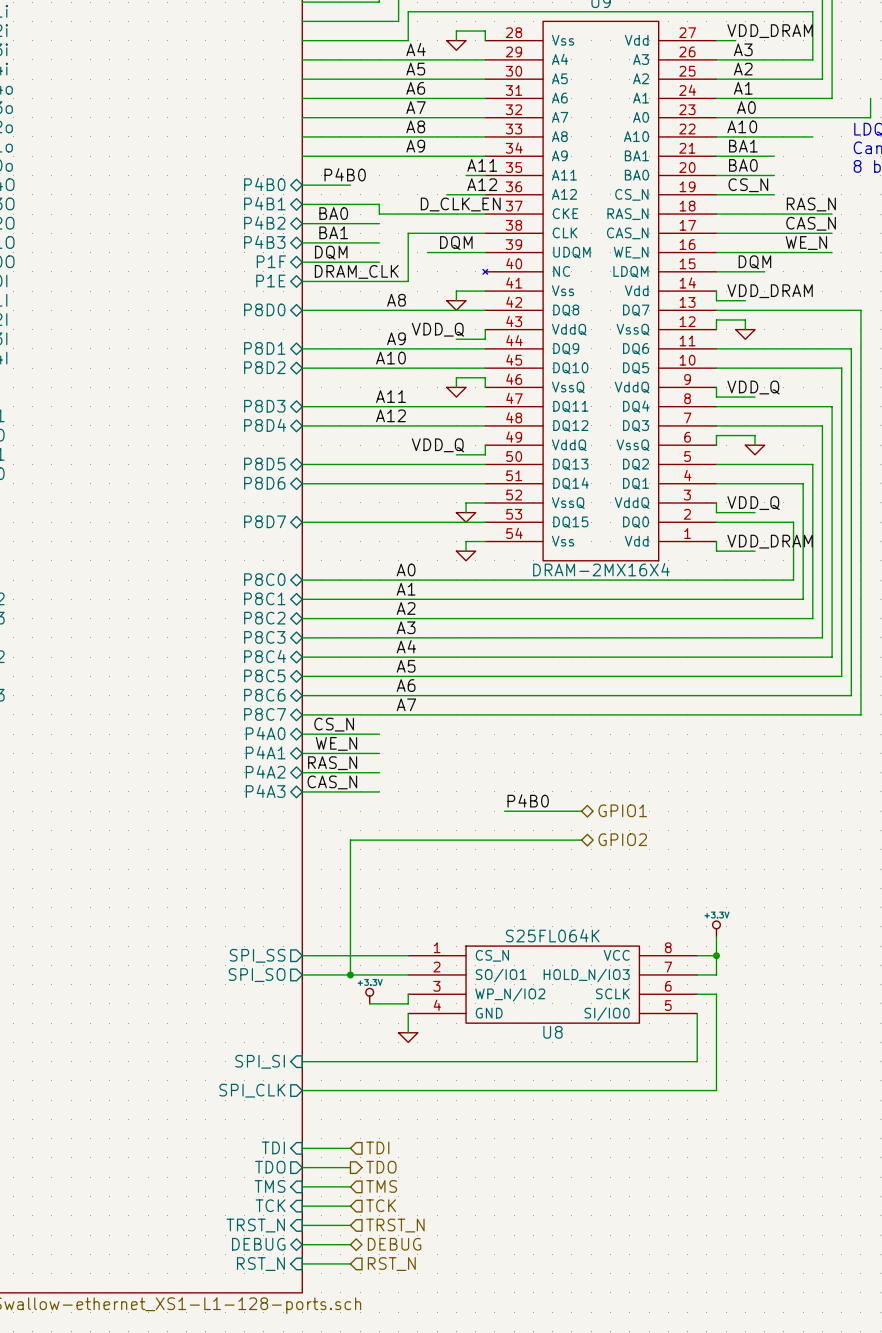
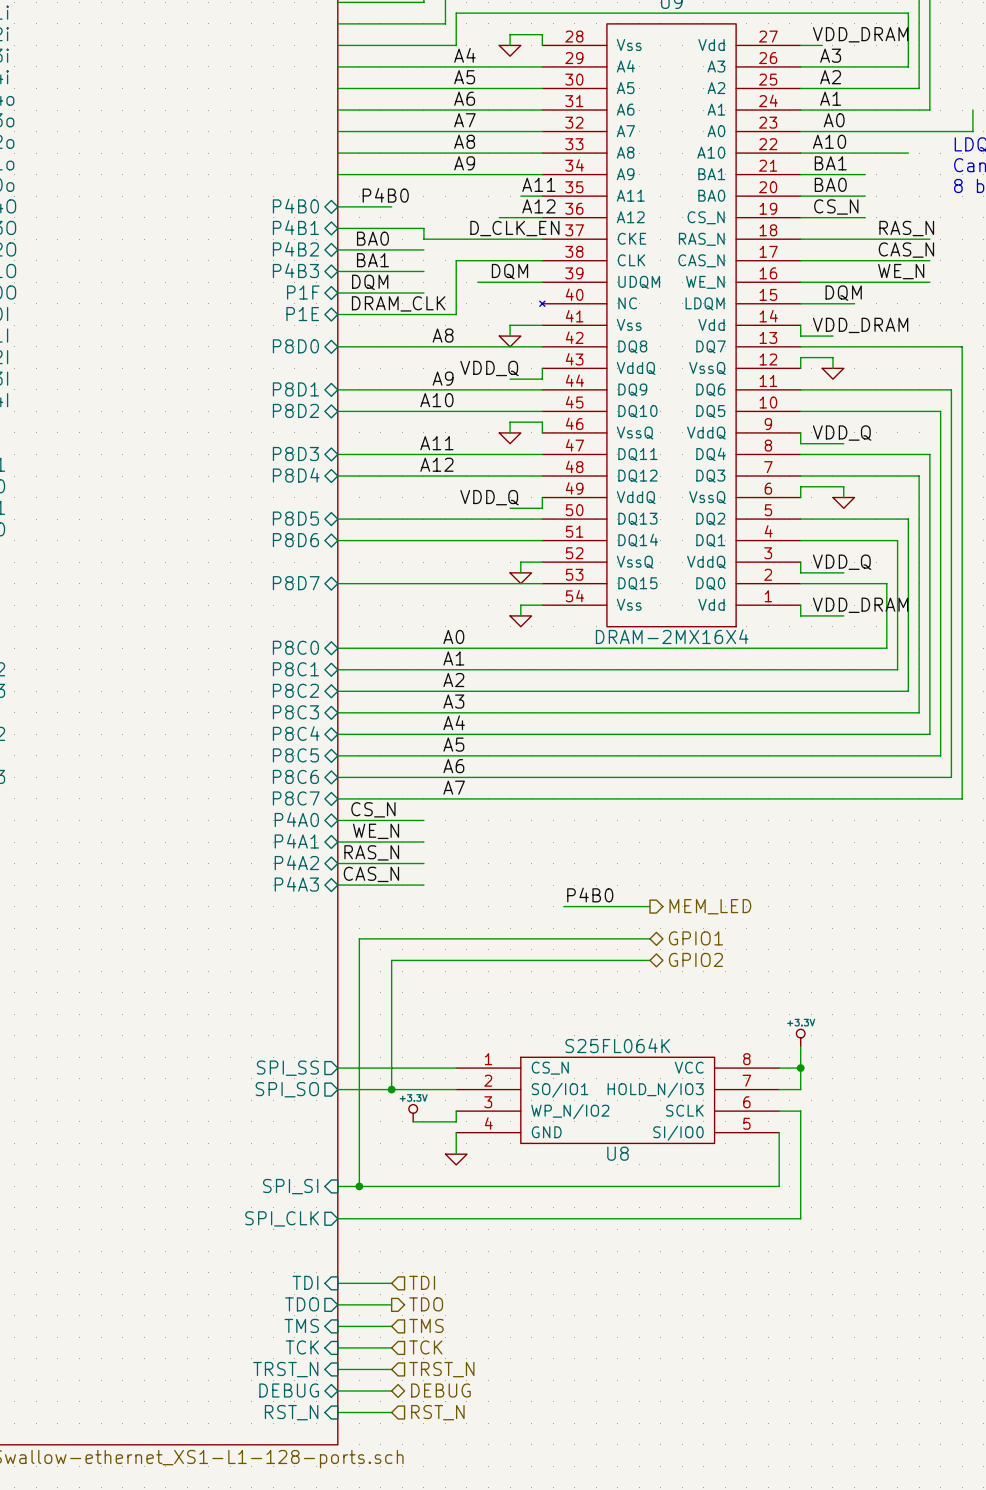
hierarchical label shape: bidirectional (622, 810) -> output (710, 906)
hierarchical label: GPIO1 (622, 810) -> MEM_LED (710, 906)
hierarchical label: GPIO2 (622, 839) -> GPIO1 (695, 938)
wire: (350, 840) (350, 859) -> (391, 938) (359, 938) (359, 1186)
hierarchical label: none -> GPIO2 (695, 959)
wire: none -> (391, 960) (649, 960)
junction: none -> (359, 1186)

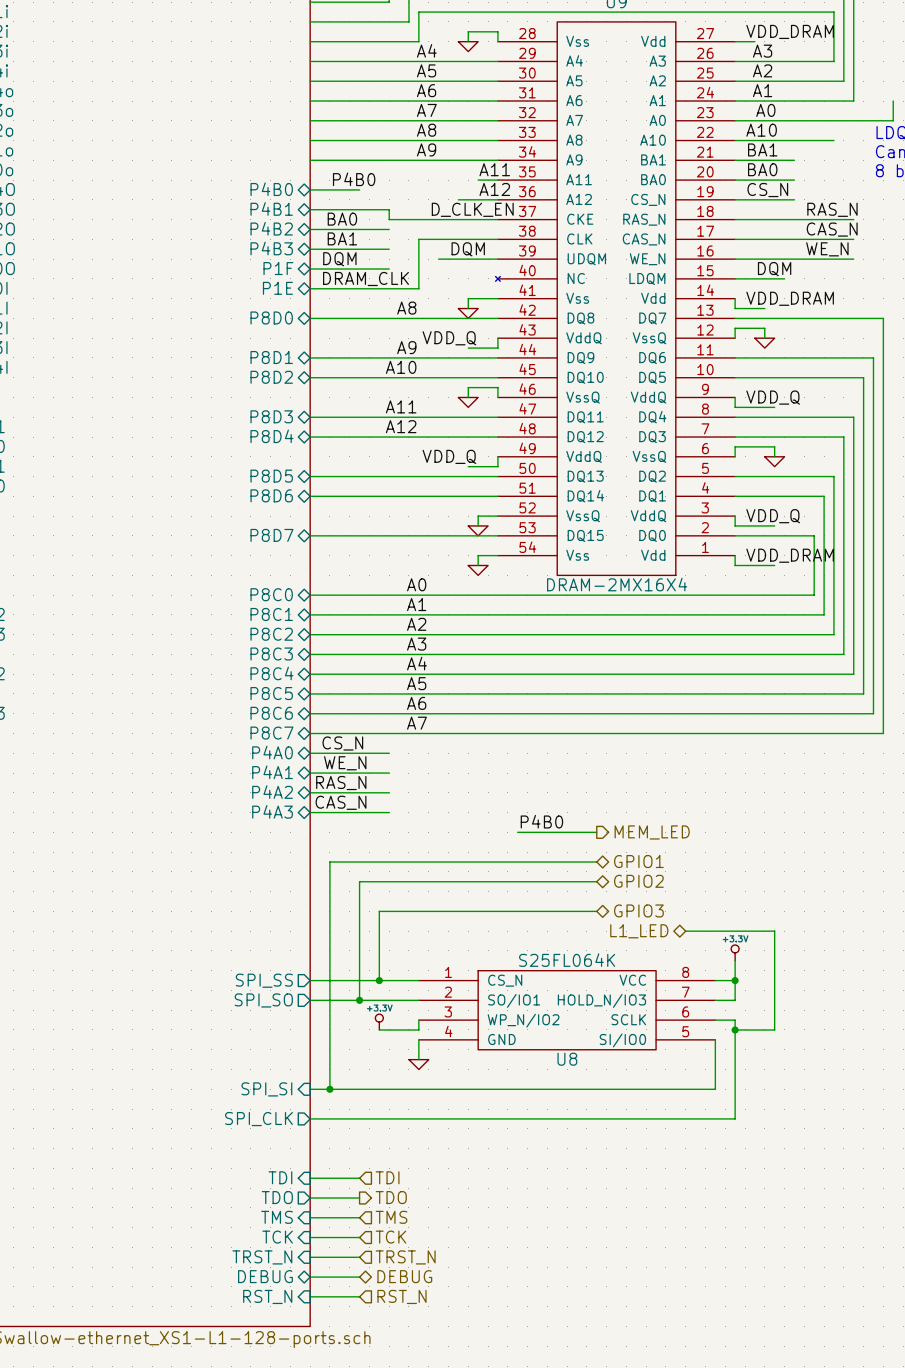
wire: none -> (596, 911) (379, 911) (379, 980)
hierarchical label: none -> GPIO3 (638, 910)
hierarchical label: none -> L1_LED (639, 931)
wire: none -> (685, 931) (774, 931) (774, 1029) (735, 1029)
junction: none -> (379, 980)
junction: none -> (735, 1029)

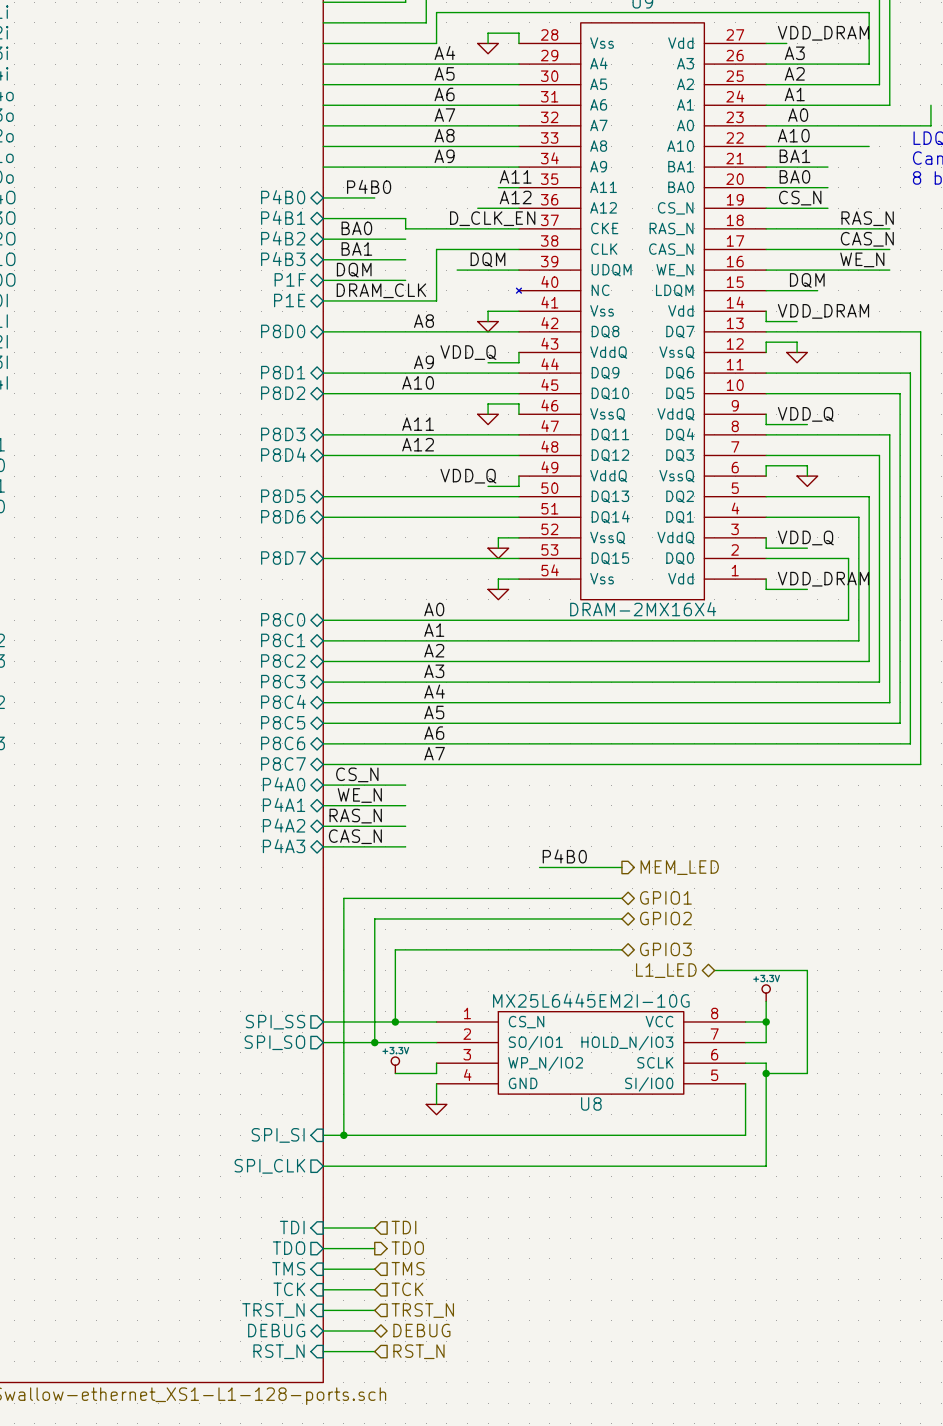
U8 value: S25FL064K (567, 960) -> MX25L6445EM2I-10G (591, 1000)

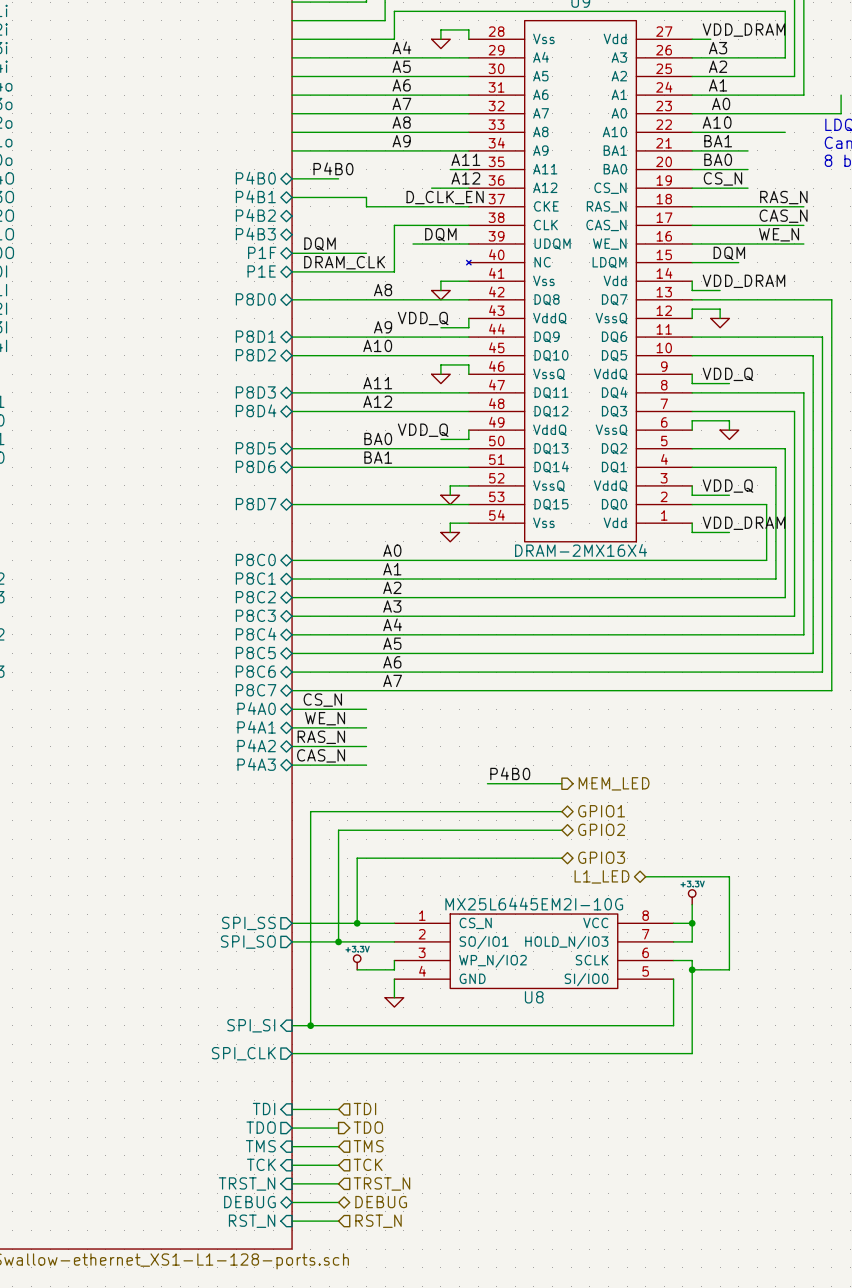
label: BA0 (356, 228) -> none
wire: (323, 239) (405, 239) -> none
label: BA1 (356, 248) -> none
wire: (323, 259) (405, 259) -> none
label: none -> BA0 (378, 438)
label: none -> BA1 (378, 457)

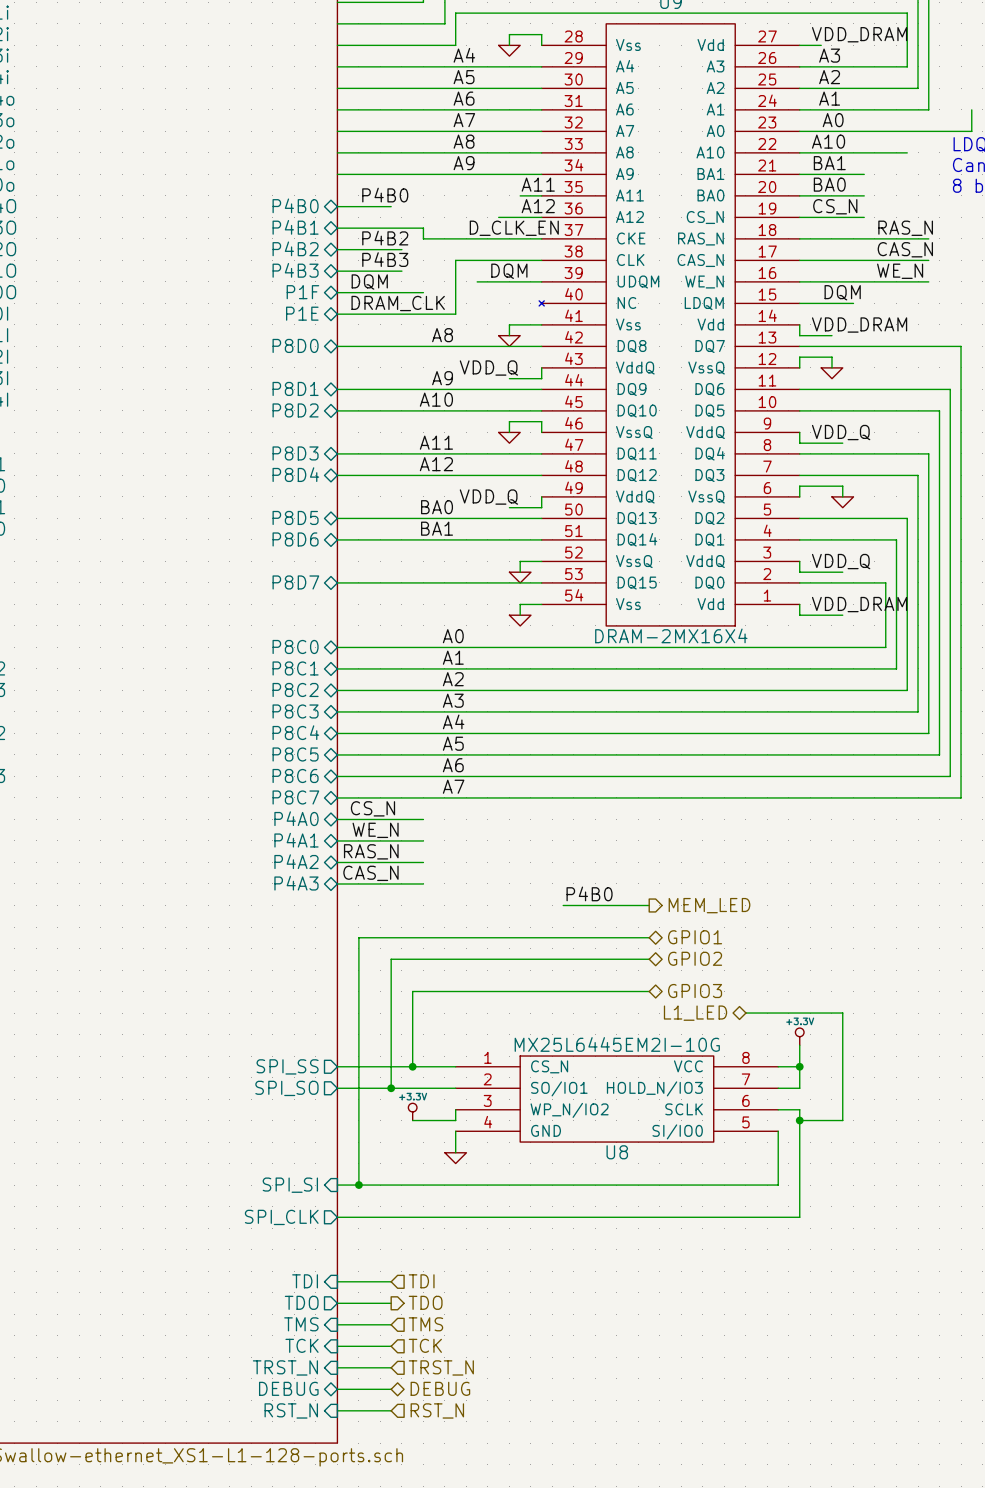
label: none -> P4B2 (385, 238)
wire: none -> (337, 249) (401, 249)
label: none -> P4B3 (385, 259)
wire: none -> (337, 271) (401, 271)

